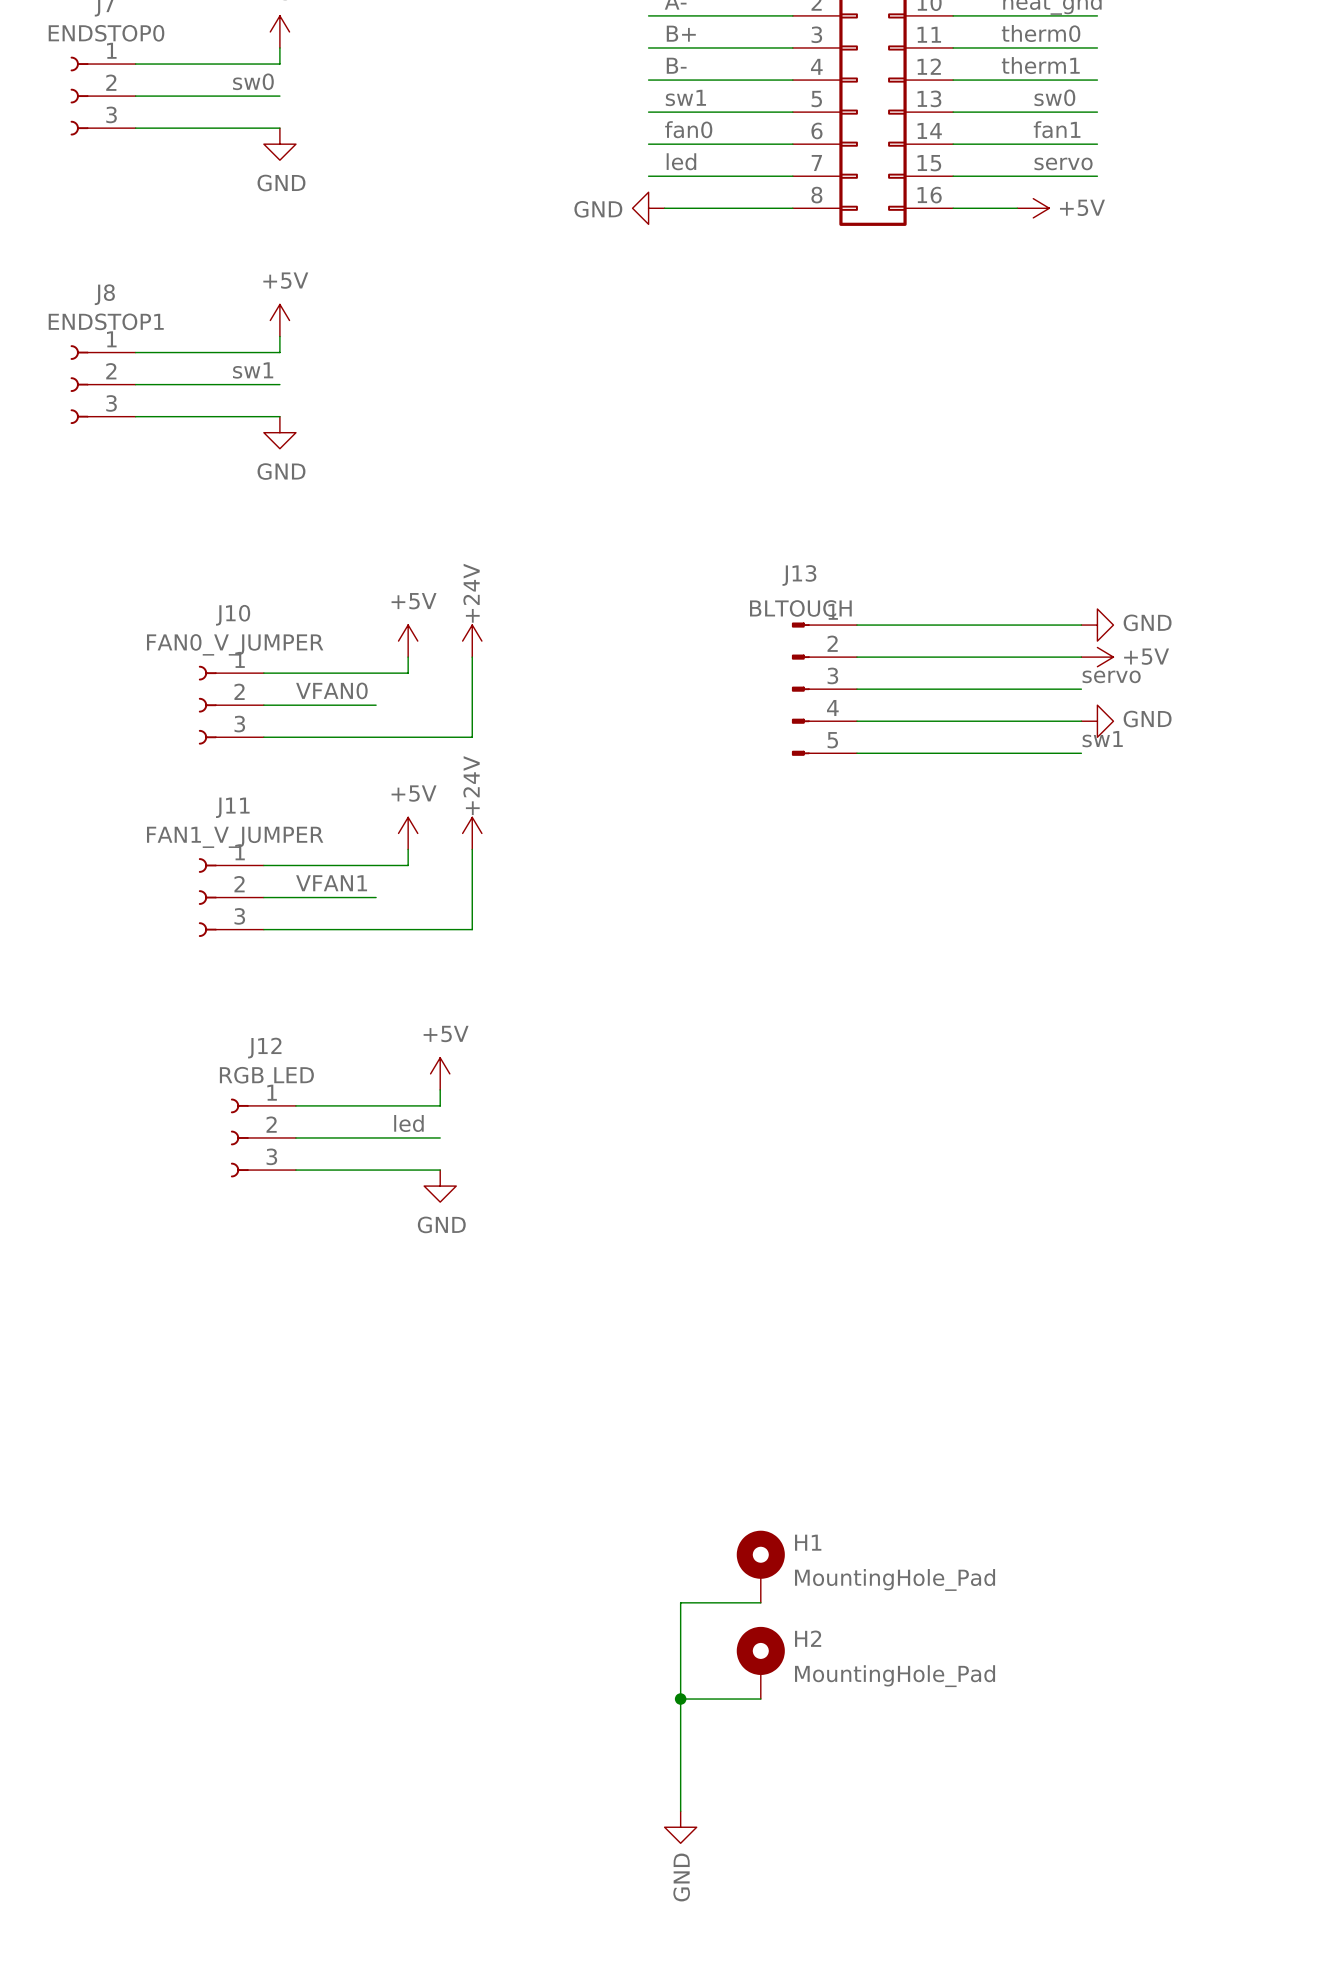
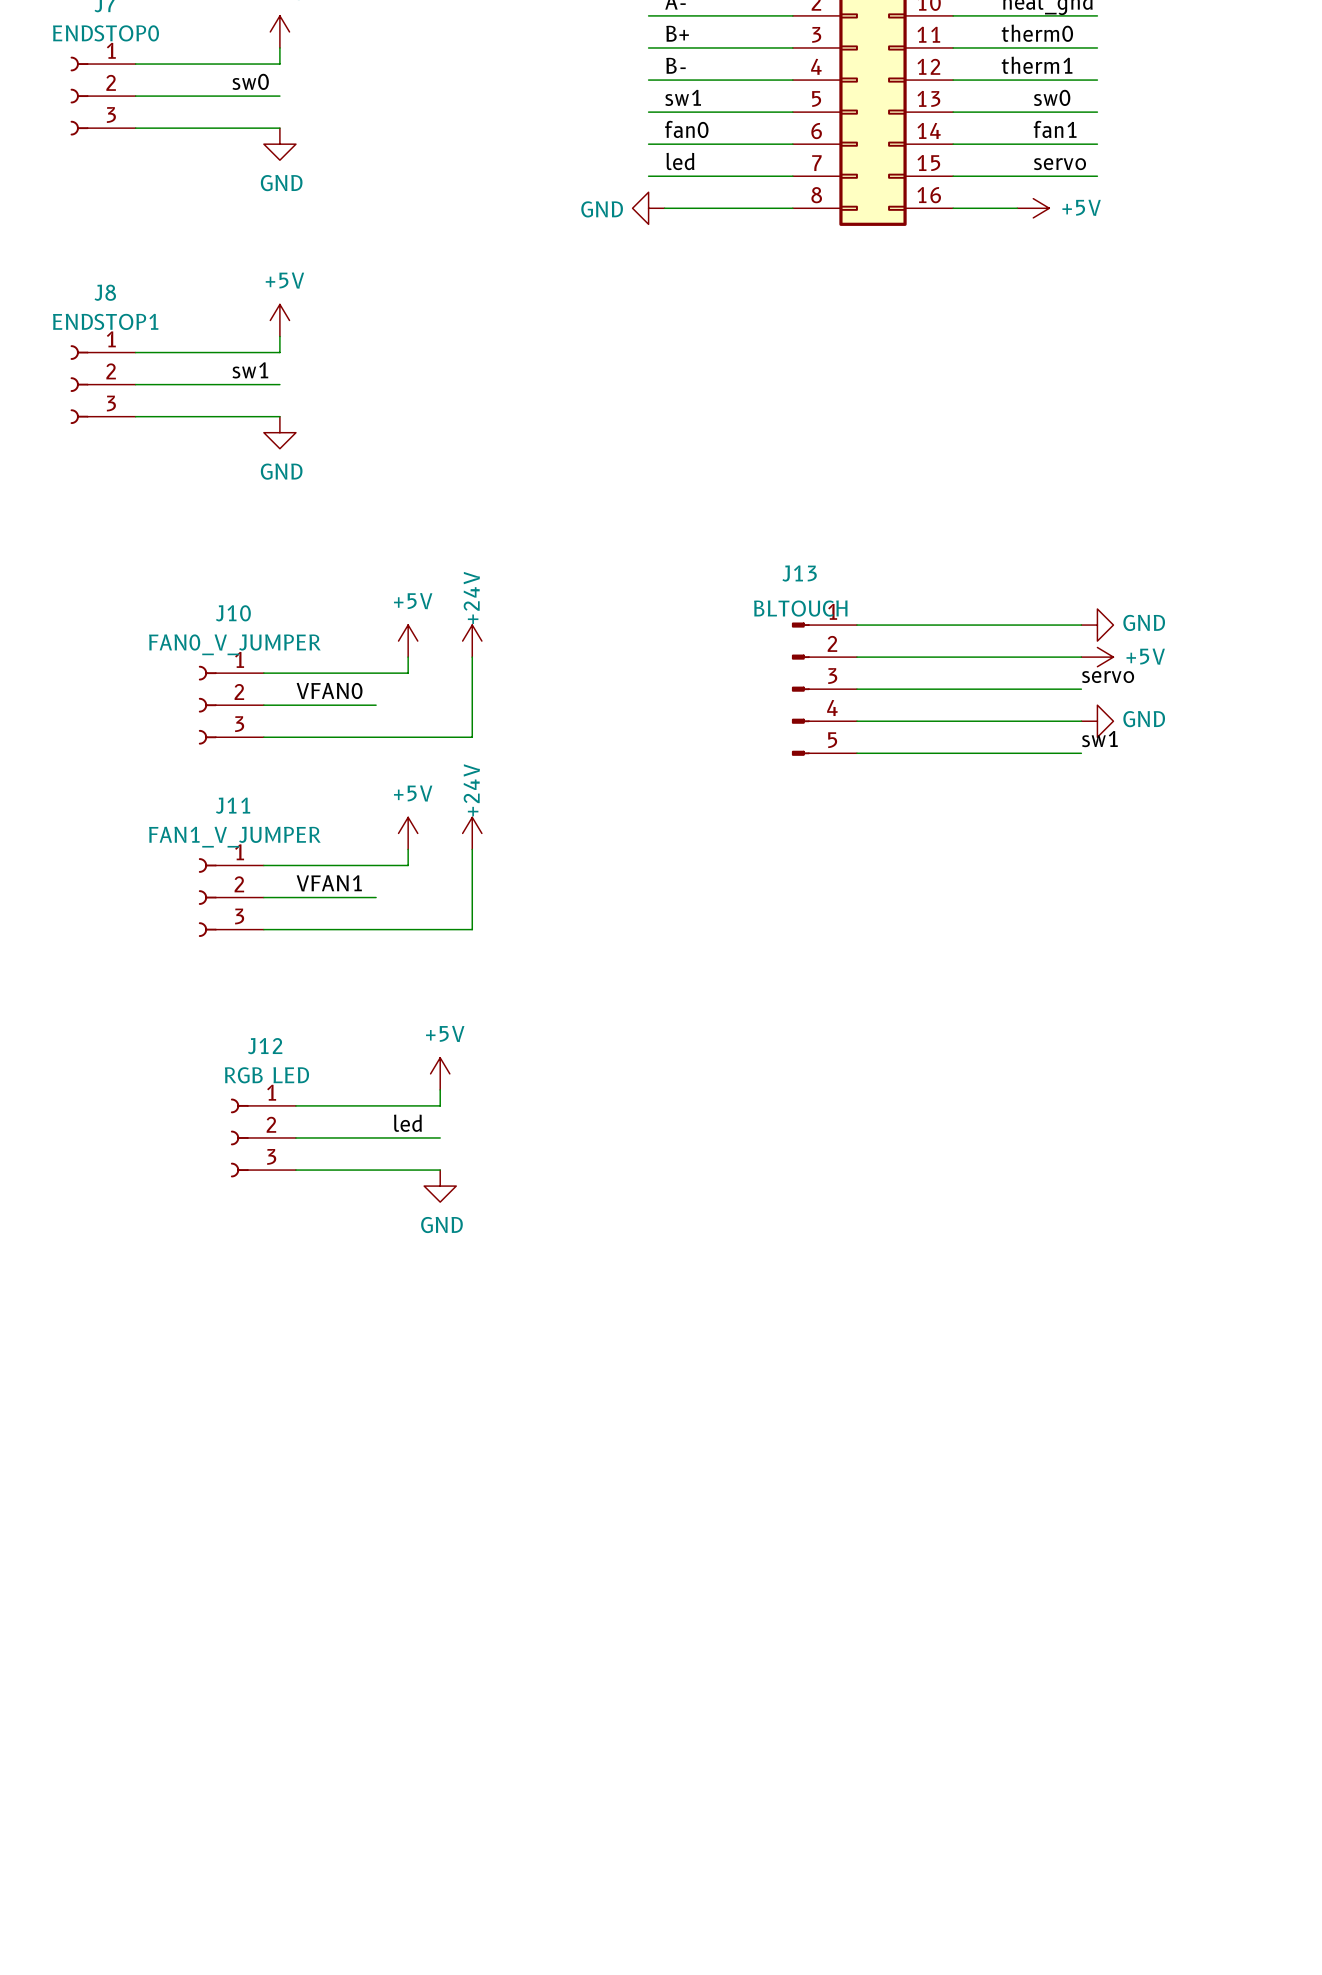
H1: MountingHole_Pad (760, 1566) -> none
wire: (760, 1602) (680, 1602) (680, 1811) -> none
H2: MountingHole_Pad (760, 1662) -> none
wire: (680, 1699) (760, 1699) -> none
junction: (680, 1699) -> none
power symbol: GND (680, 1827) -> none

